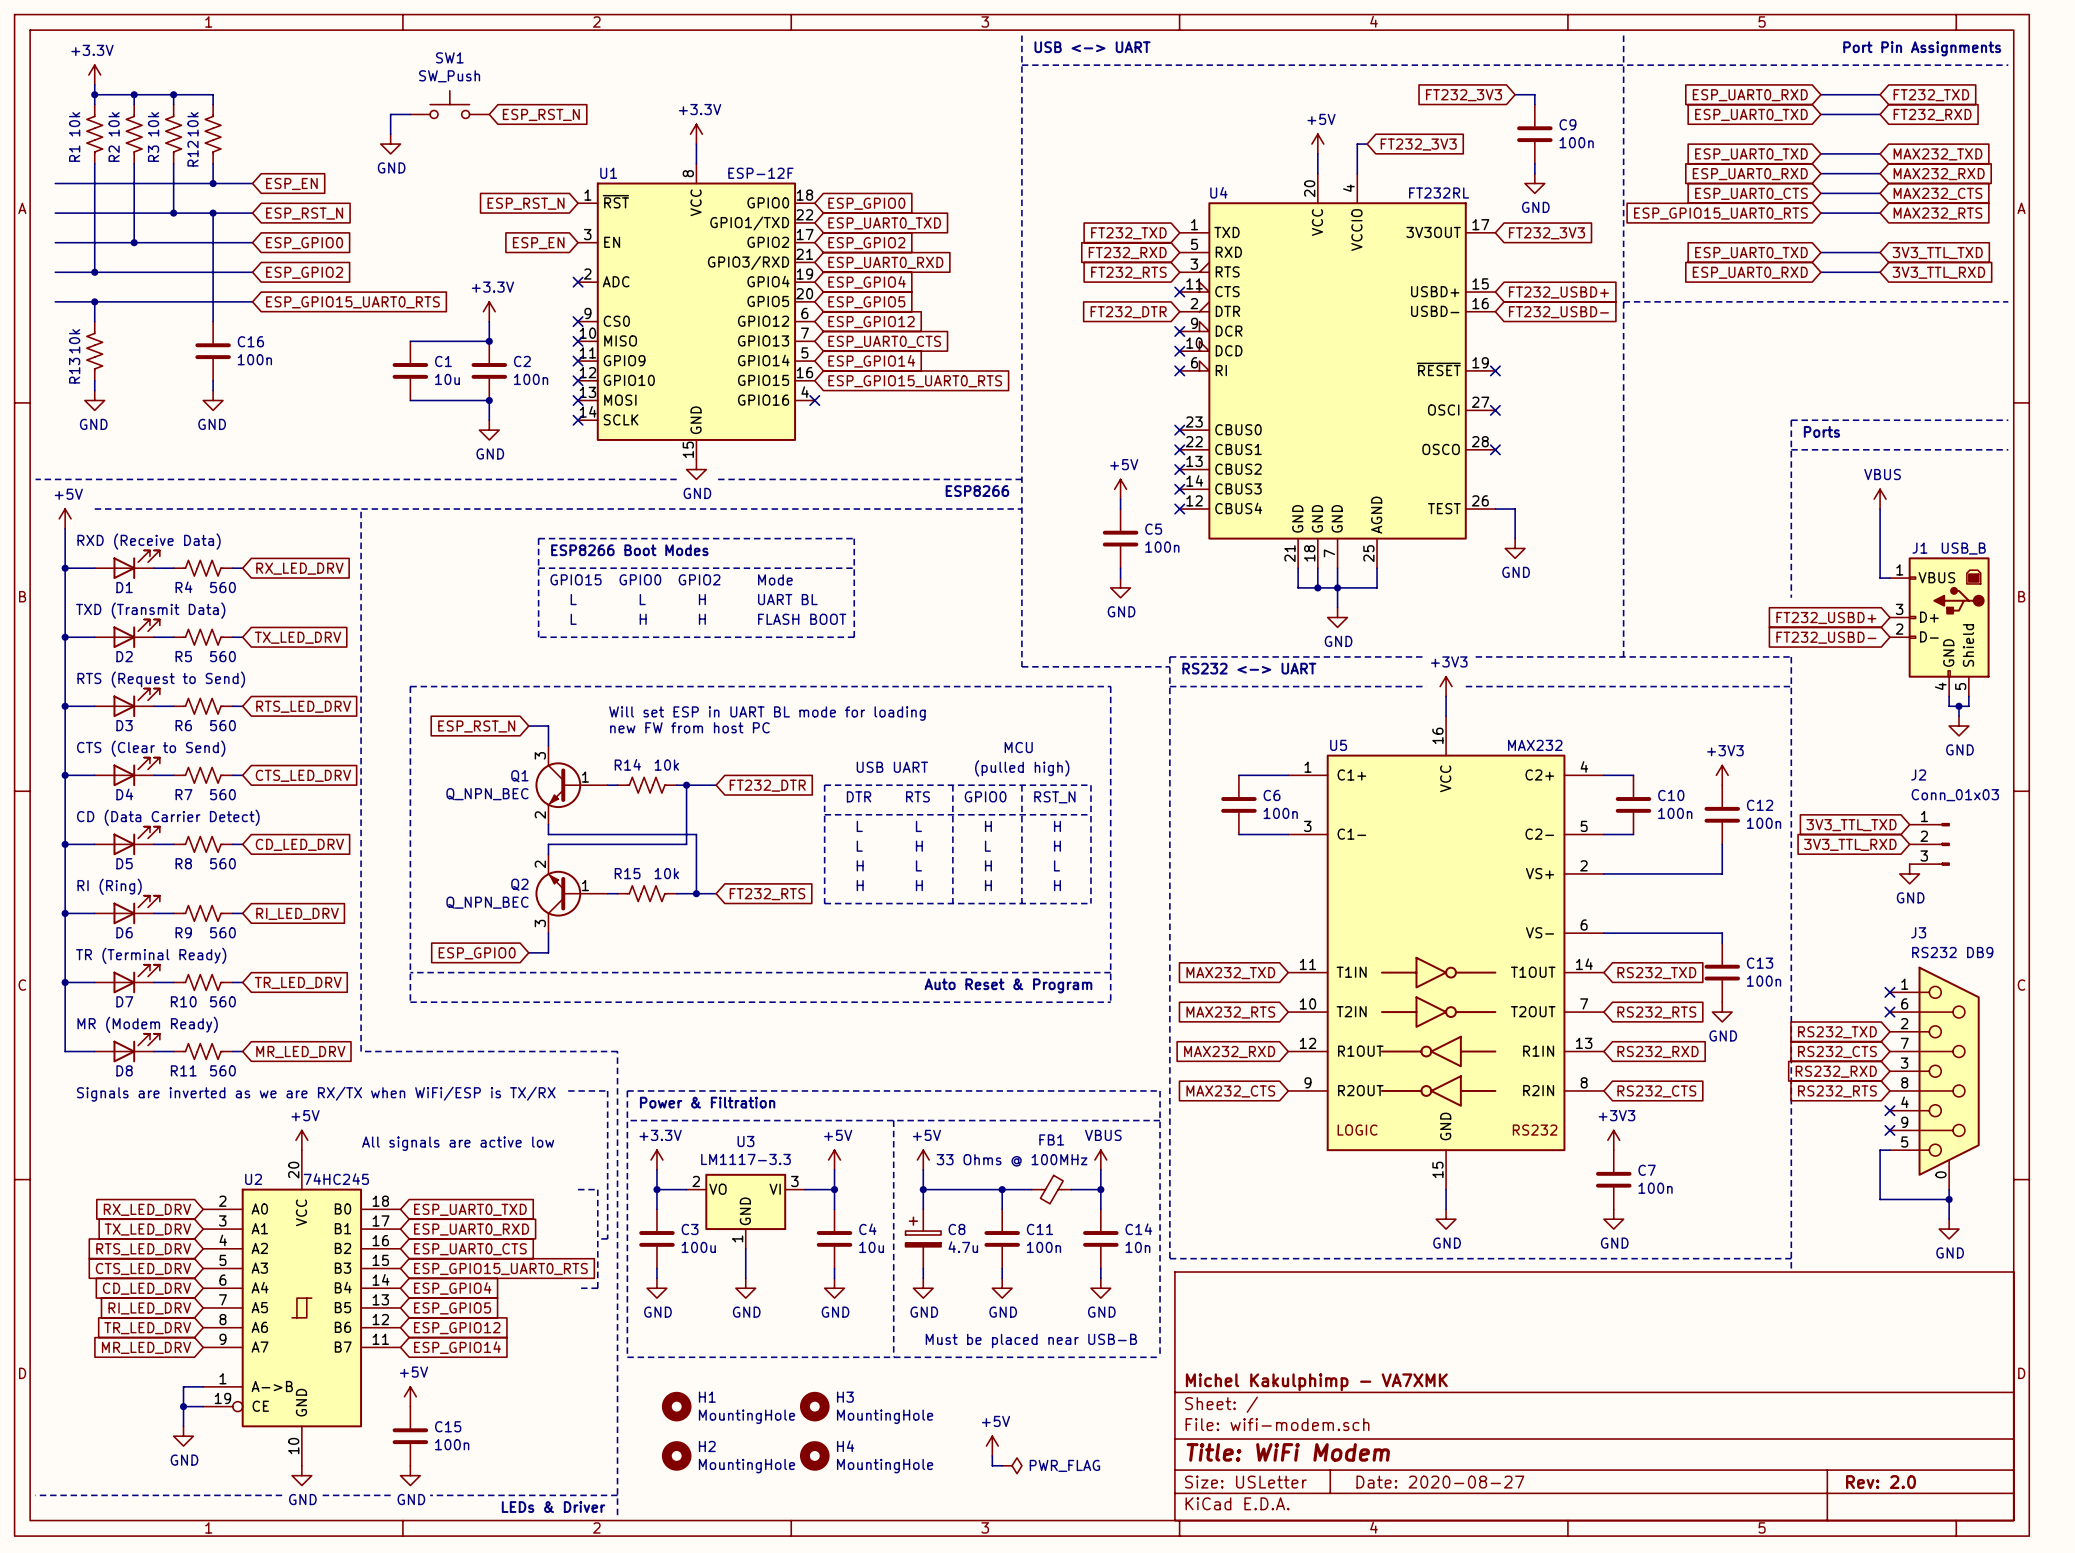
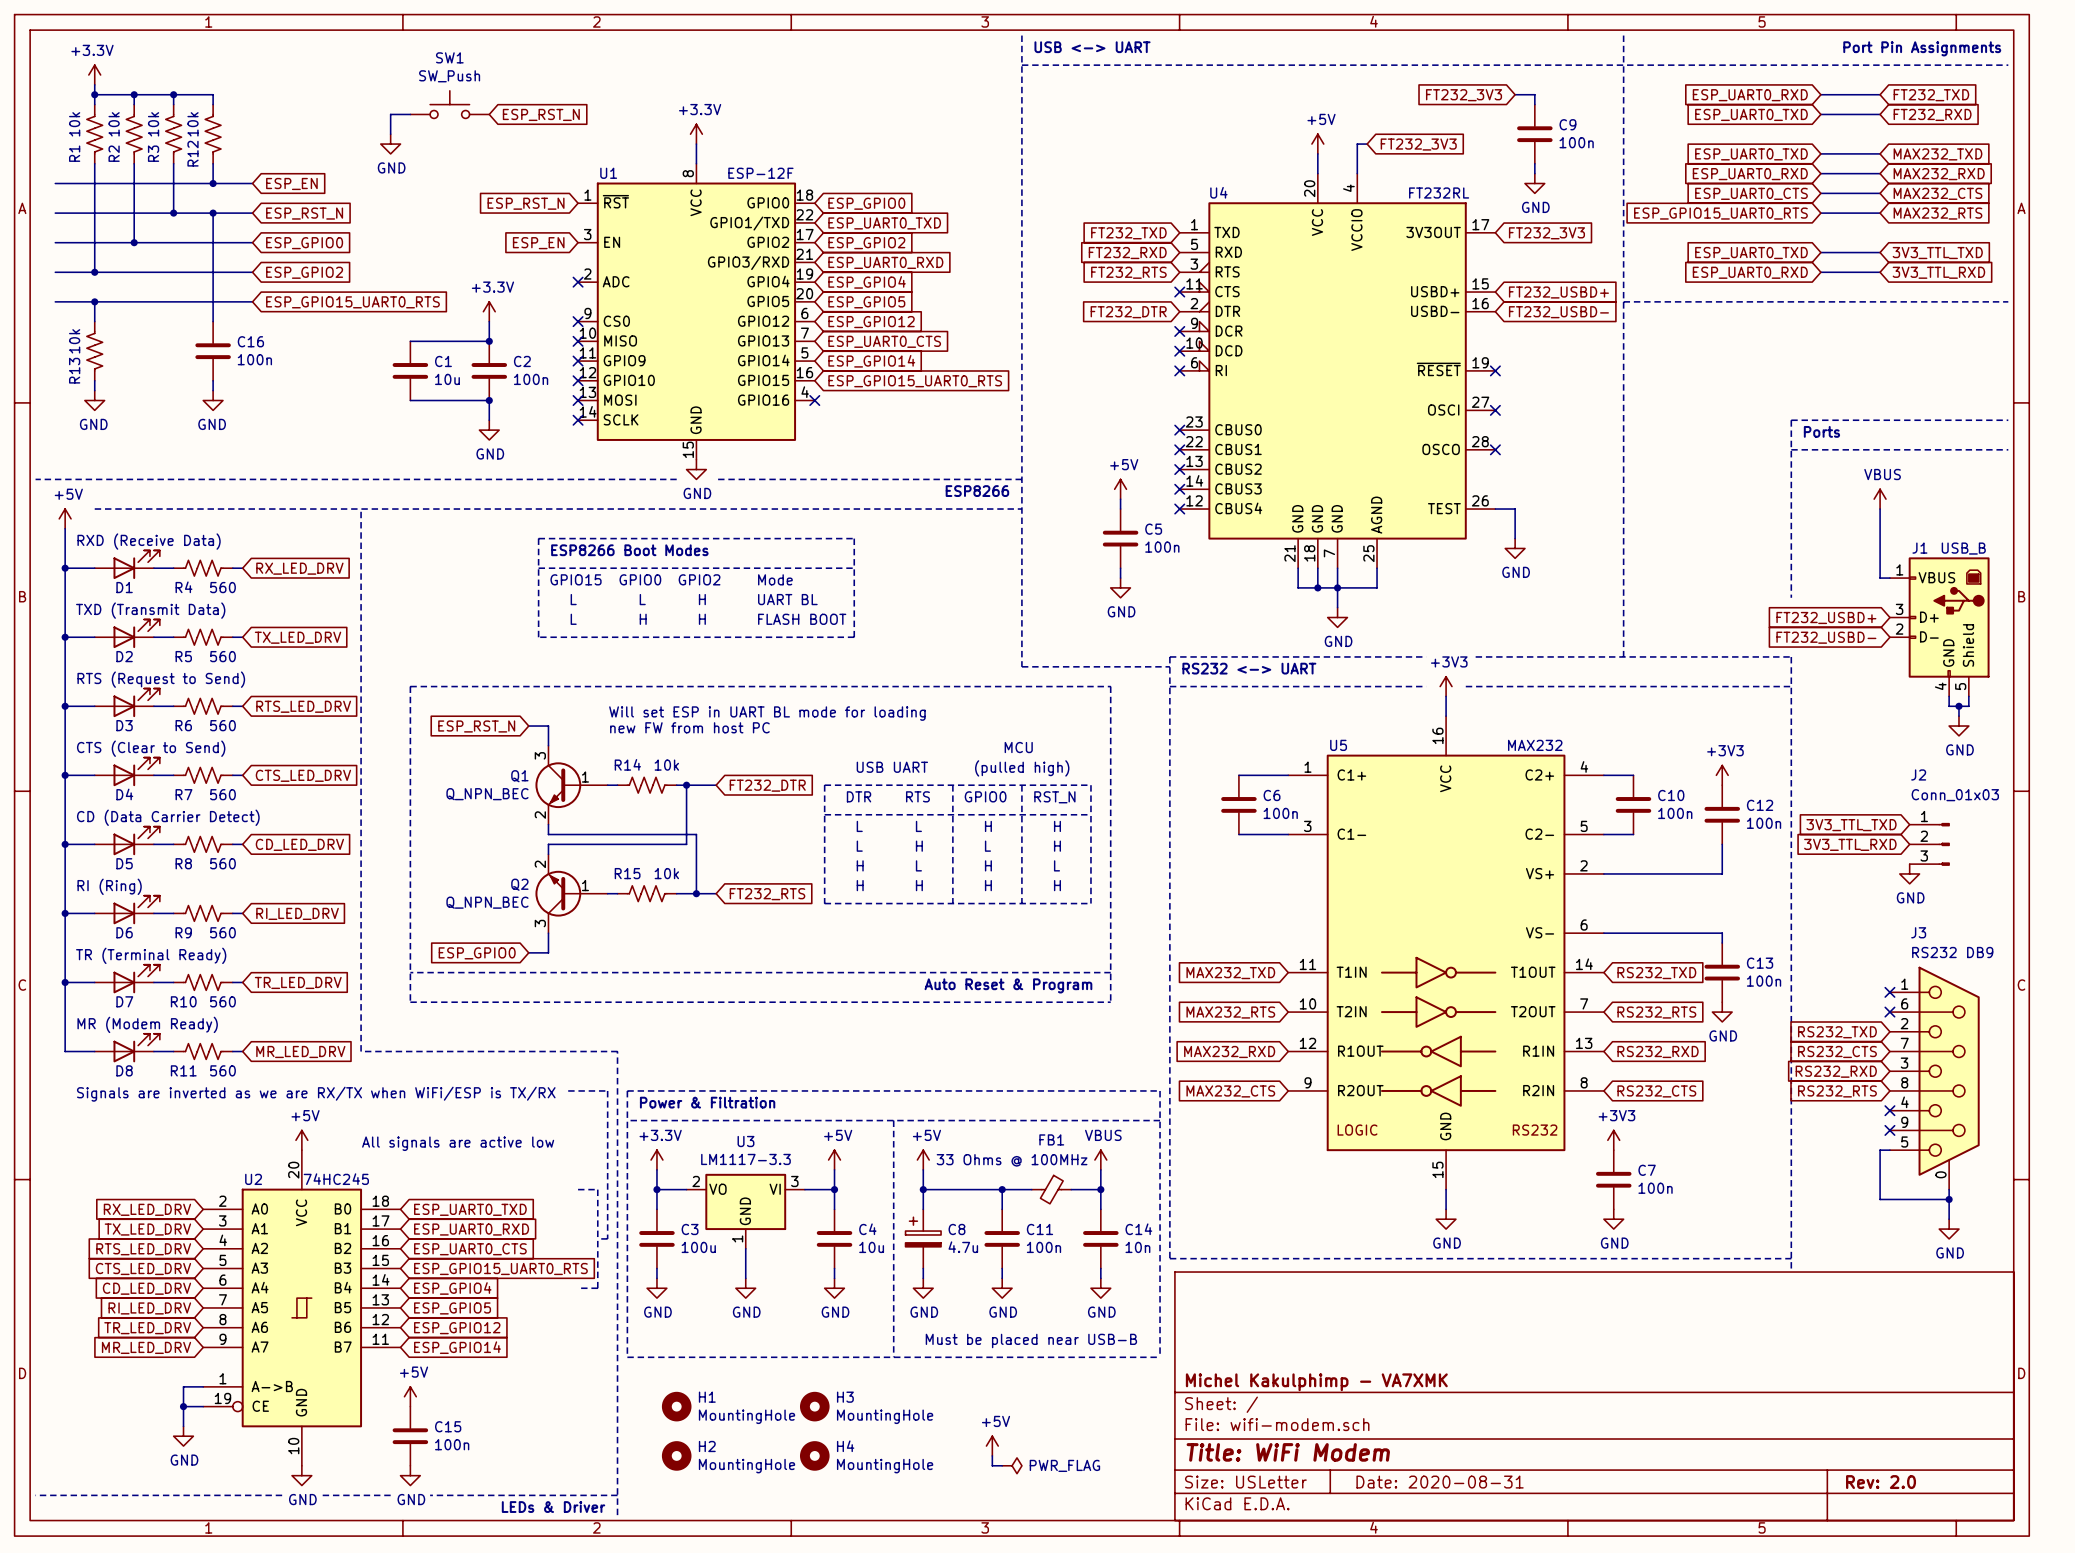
title block: Date: 2020-08-27 (1440, 1482) -> Date: 2020-08-31 (1440, 1482)

